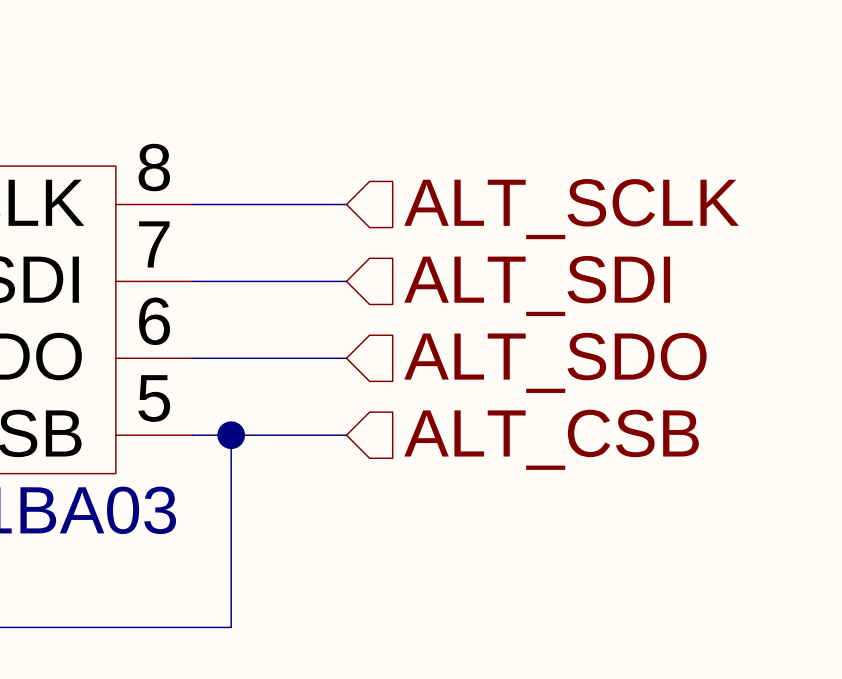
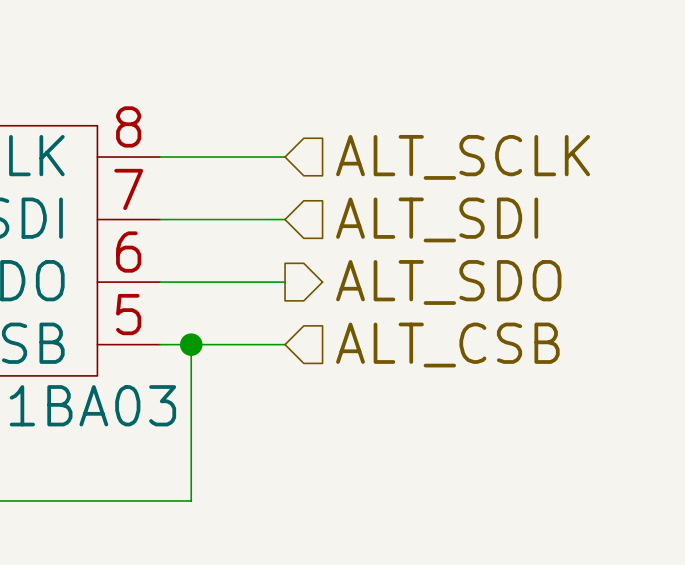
hierarchical label shape: input (555, 362) -> output (448, 282)

